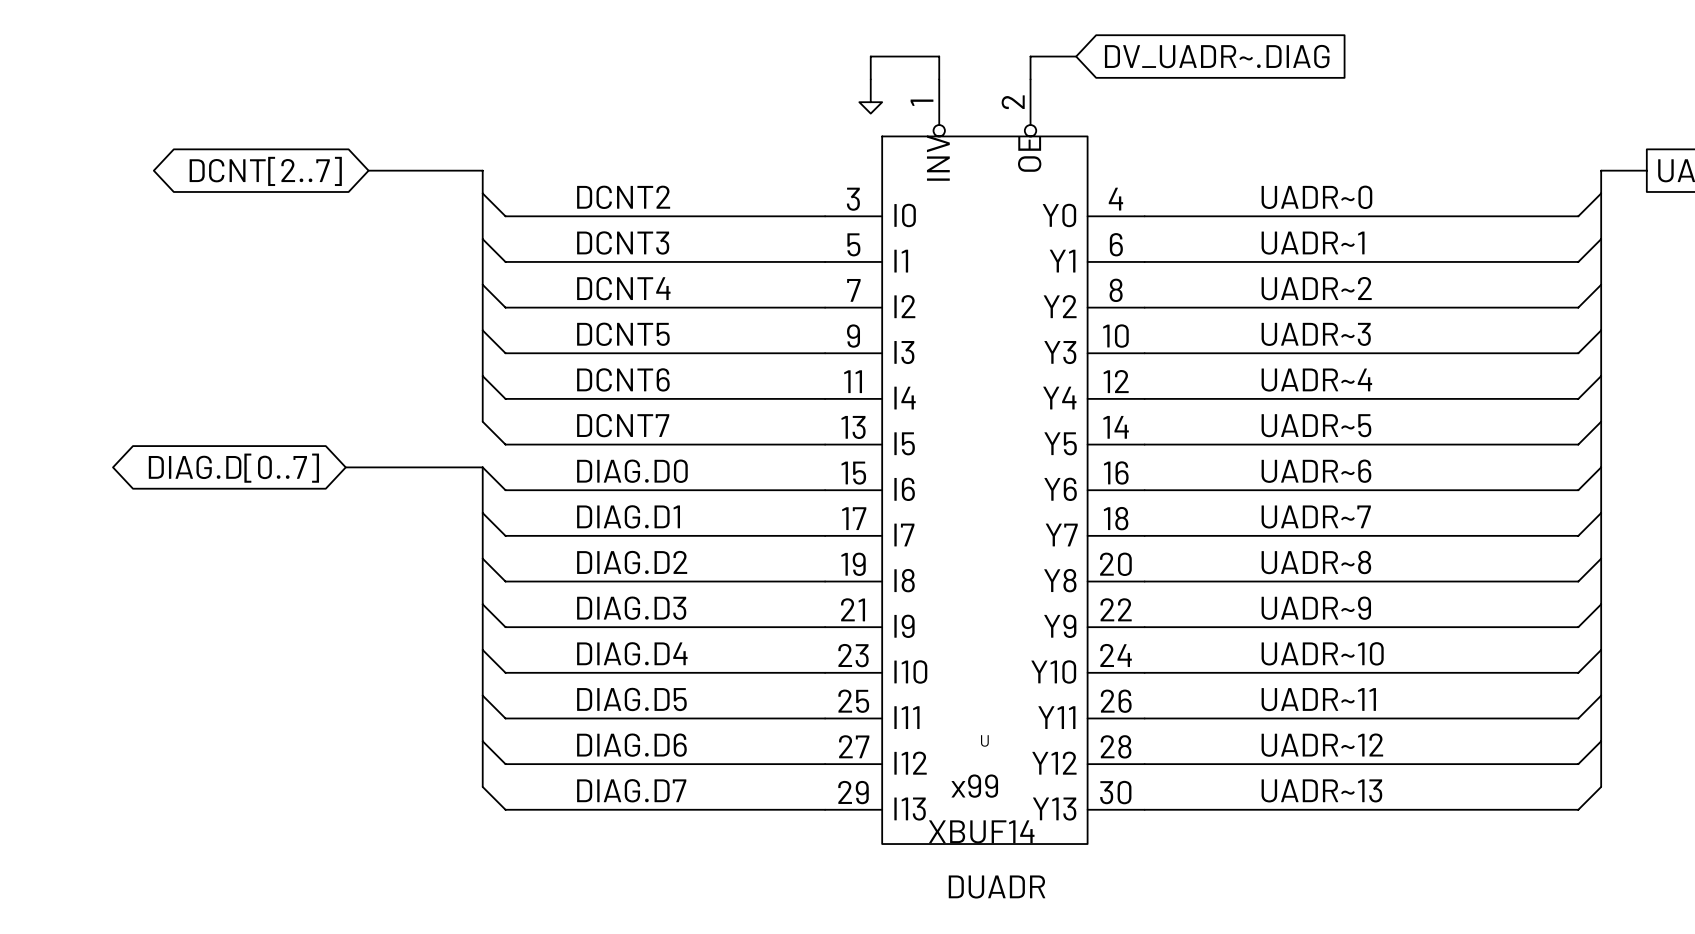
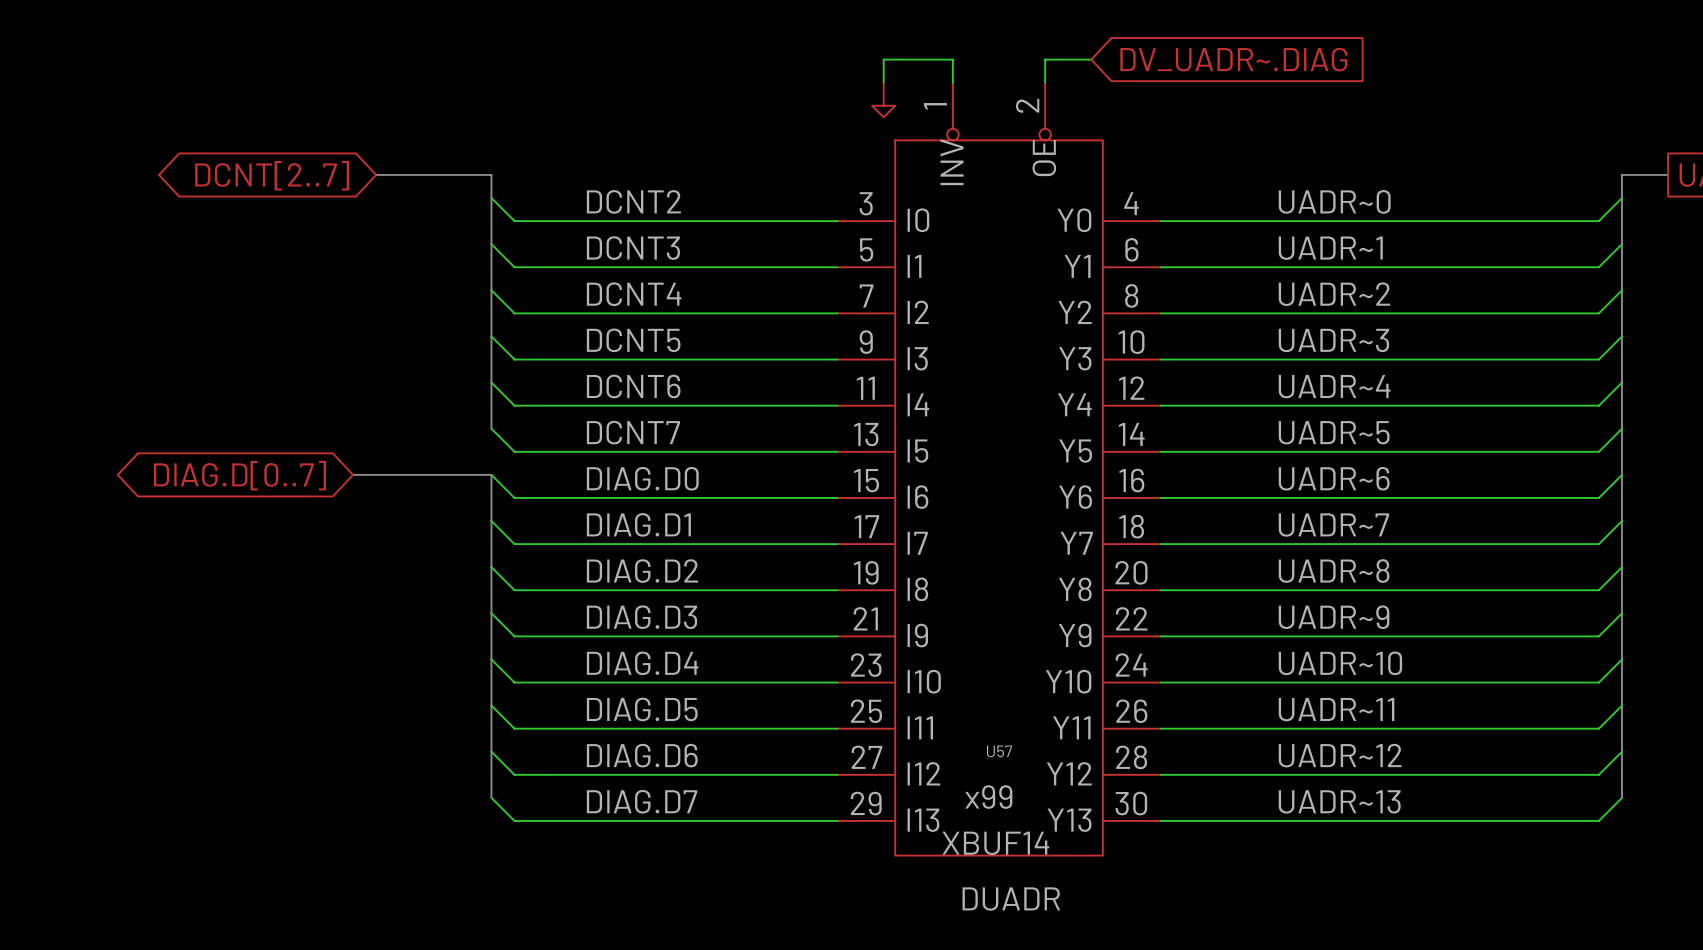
U name: U (984, 740) -> U57 (999, 751)

